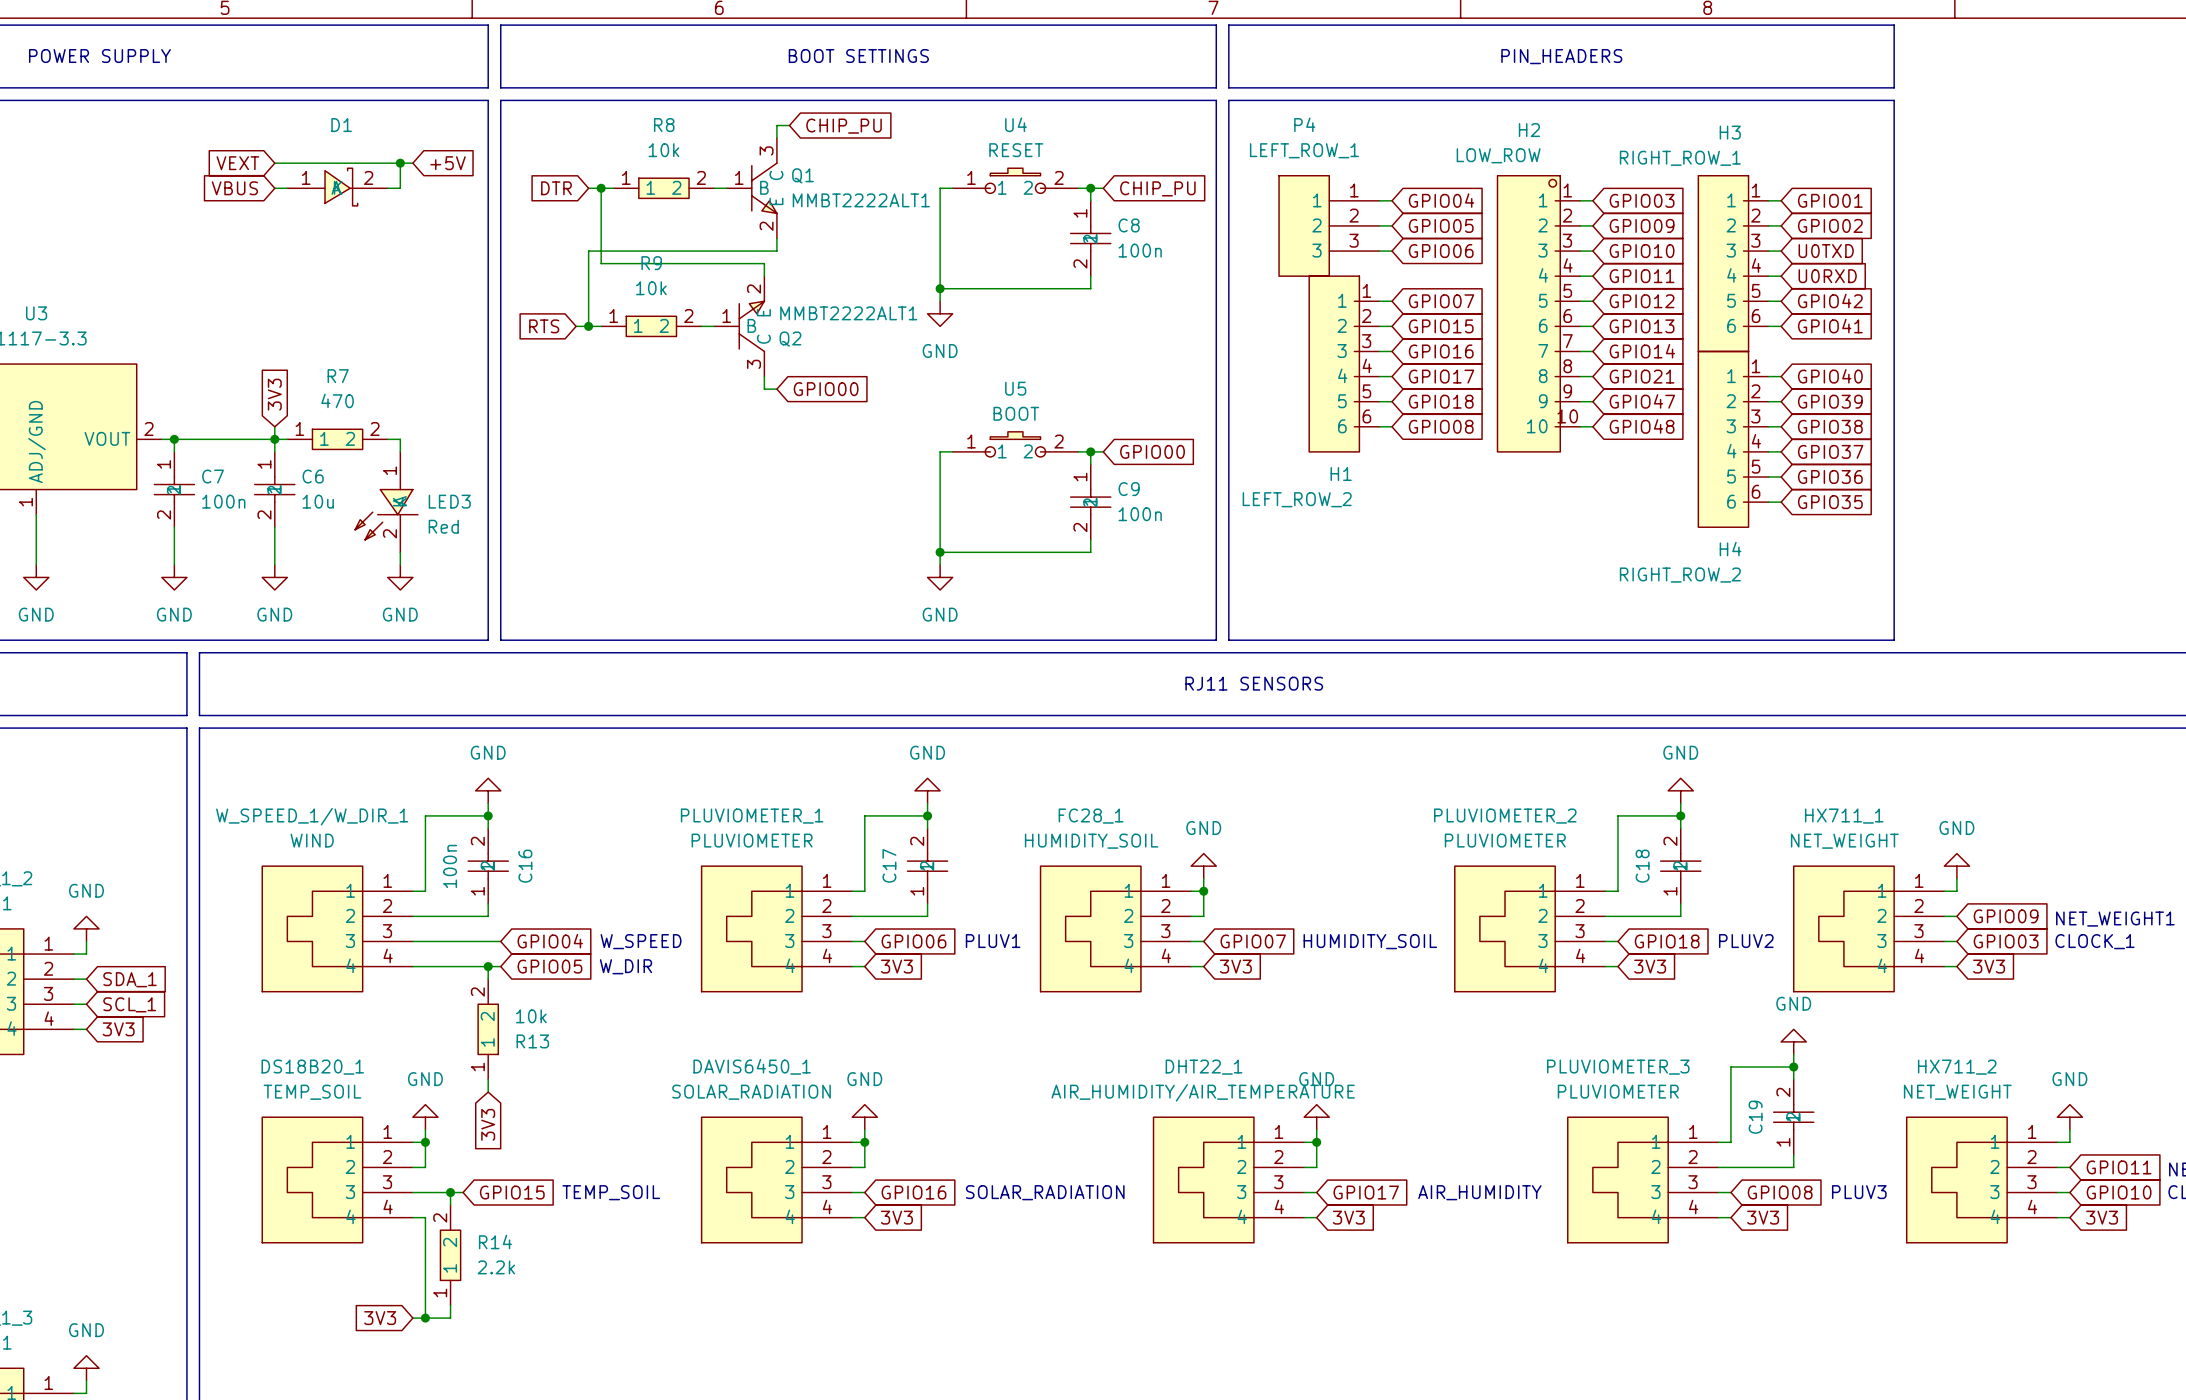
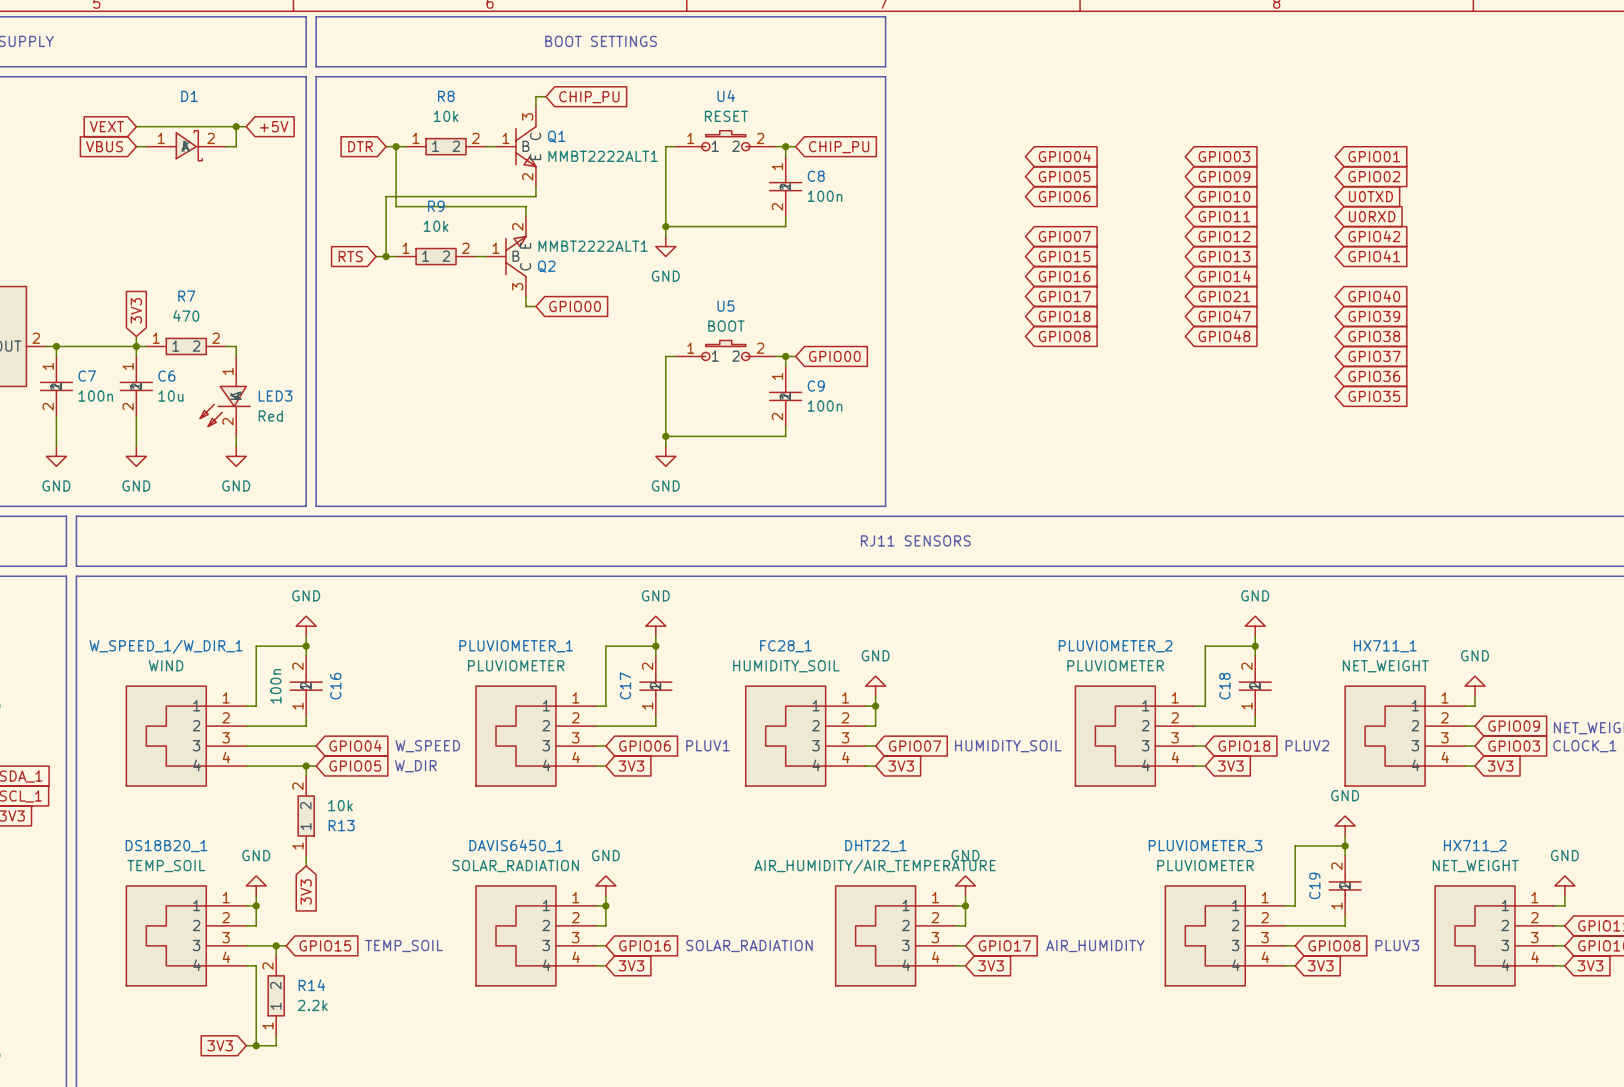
line: (1228, 25) (1228, 87) (1894, 87) (1894, 25) (1228, 25) -> none
text: PIN_HEADERS (1561, 56) -> none
line: (1228, 100) (1894, 100) (1894, 640) (1228, 640) (1228, 100) -> none
wire: (1379, 200) (1392, 200) -> none
wire: (1580, 200) (1592, 200) -> none
wire: (1768, 200) (1781, 200) -> none
P4: LEFT_ROW_1 (1329, 225) -> none
wire: (1379, 225) (1392, 225) -> none
wire: (1580, 225) (1592, 225) -> none
wire: (1768, 225) (1781, 225) -> none
wire: (1379, 251) (1392, 251) -> none
wire: (1580, 251) (1592, 251) -> none
wire: (1768, 251) (1781, 251) -> none
H3: RIGHT_ROW_1 (1733, 263) -> none
wire: (1580, 276) (1592, 276) -> none
wire: (1768, 276) (1781, 276) -> none
wire: (1379, 301) (1392, 301) -> none
wire: (1580, 301) (1592, 301) -> none
wire: (1768, 301) (1781, 301) -> none
H2: LOW_ROW (1538, 313) -> none
wire: (1379, 326) (1392, 326) -> none
wire: (1580, 326) (1592, 326) -> none
wire: (1768, 326) (1781, 326) -> none
wire: (1379, 351) (1392, 351) -> none
wire: (1580, 351) (1592, 351) -> none
H1: LEFT_ROW_2 (1344, 364) -> none
wire: (1379, 376) (1392, 376) -> none
wire: (1580, 376) (1592, 376) -> none
wire: (1768, 376) (1781, 376) -> none
wire: (1379, 401) (1392, 401) -> none
wire: (1580, 401) (1592, 401) -> none
wire: (1768, 401) (1781, 401) -> none
wire: (1379, 426) (1392, 426) -> none
wire: (1580, 426) (1592, 426) -> none
wire: (1768, 426) (1781, 426) -> none
H4: RIGHT_ROW_2 (1733, 439) -> none
wire: (1768, 451) (1781, 451) -> none
wire: (1768, 477) (1781, 477) -> none
wire: (1768, 502) (1781, 502) -> none

